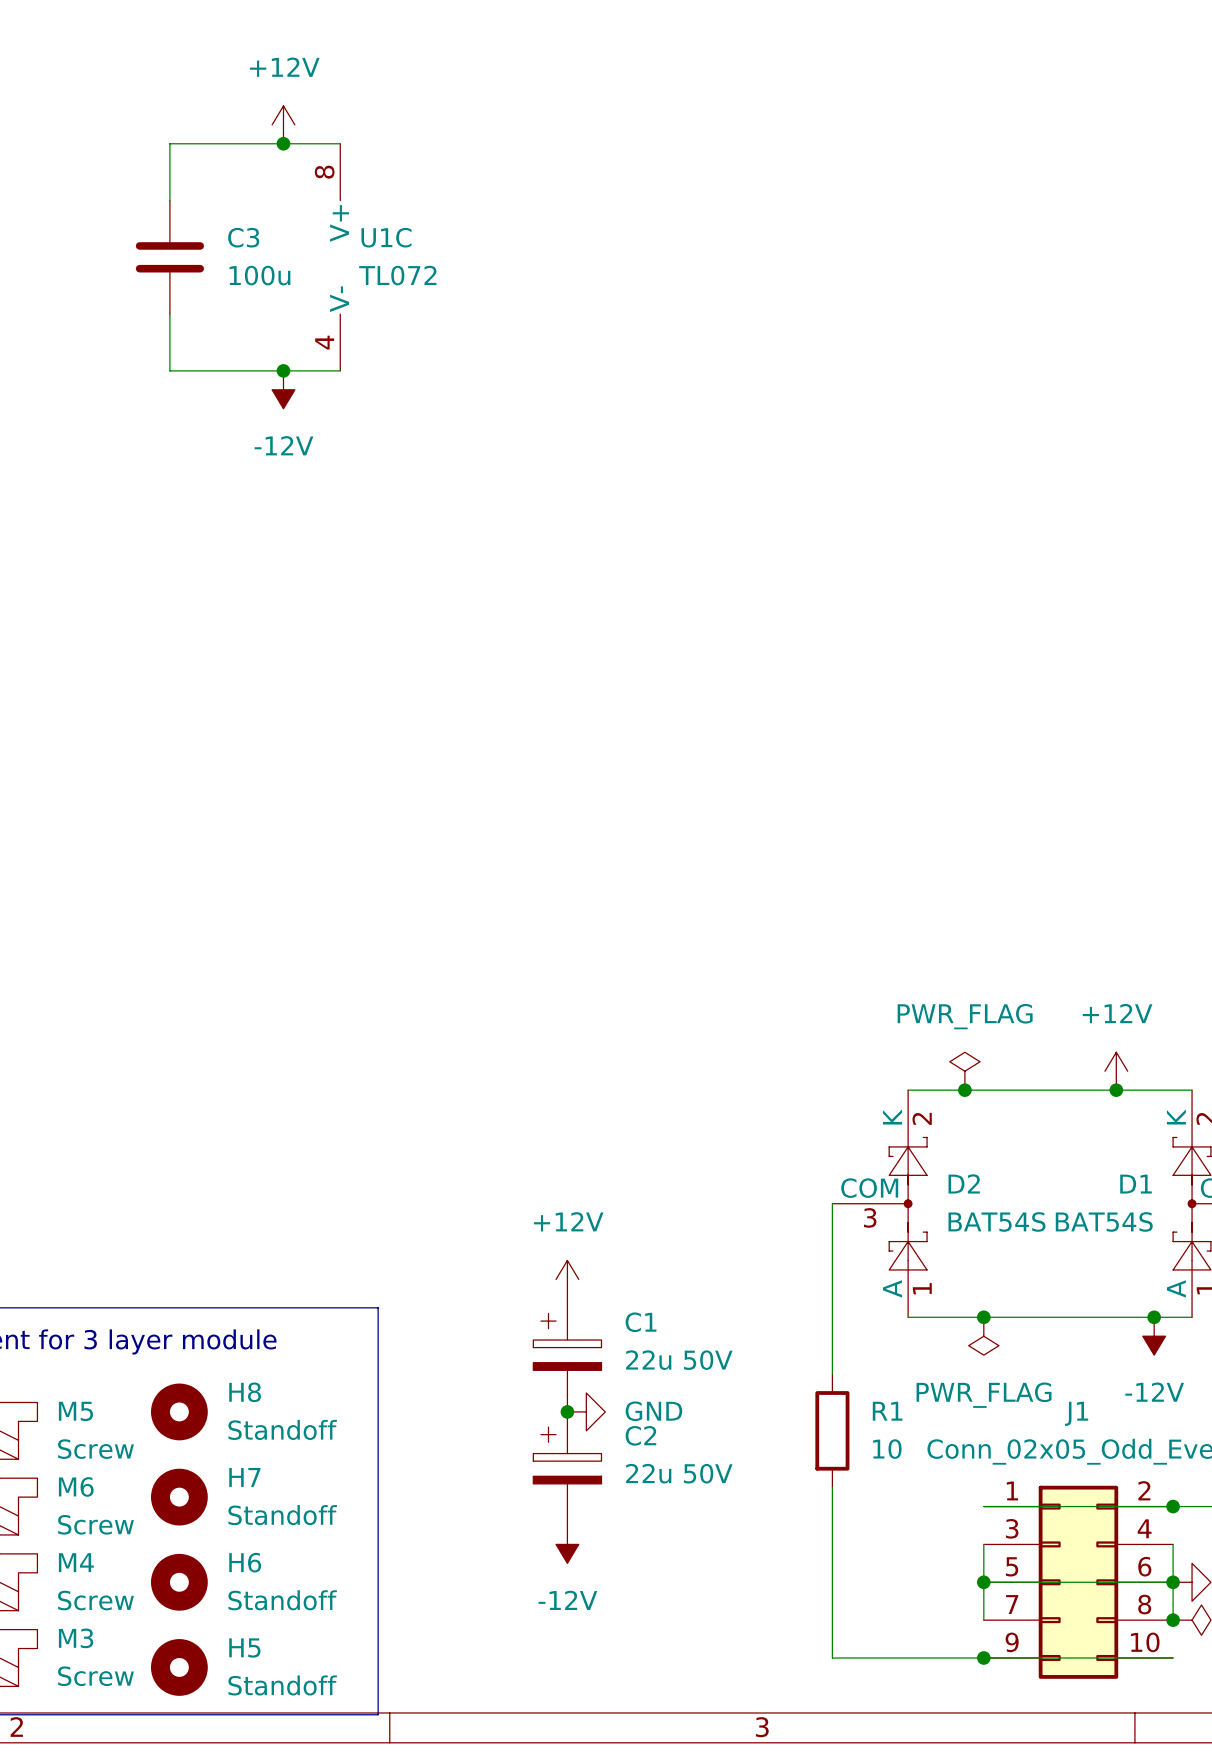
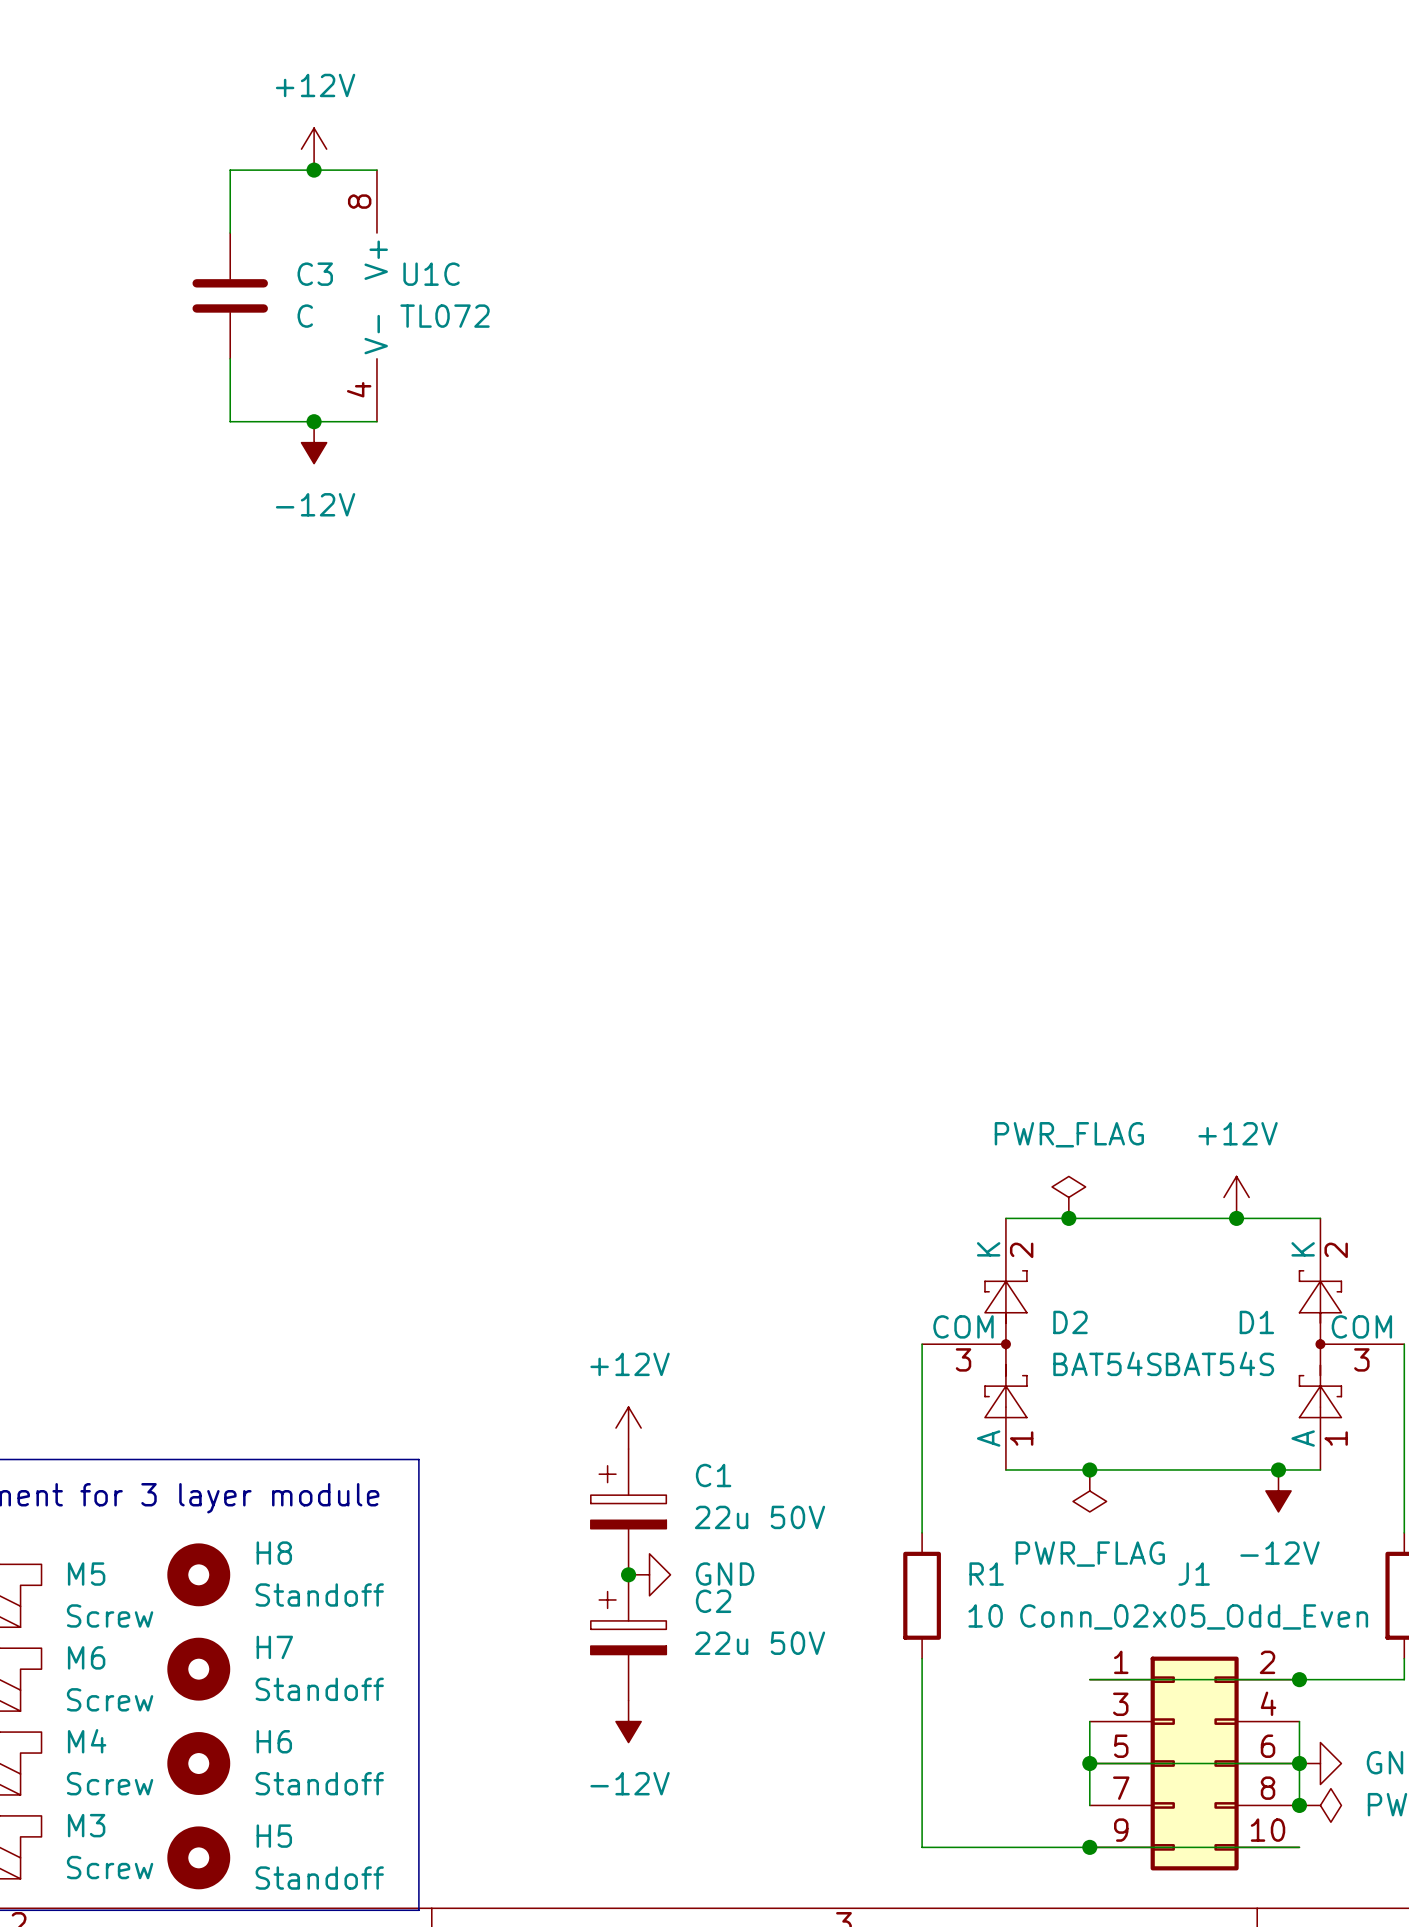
wire: (207, 143) (169, 143) (169, 200) -> (230, 170) (230, 233)
C3 position: (169, 257) -> (230, 295)
C3 value: 100u (259, 275) -> C (305, 316)
wire: (169, 314) (169, 370) (207, 370) -> (230, 358) (230, 421)

